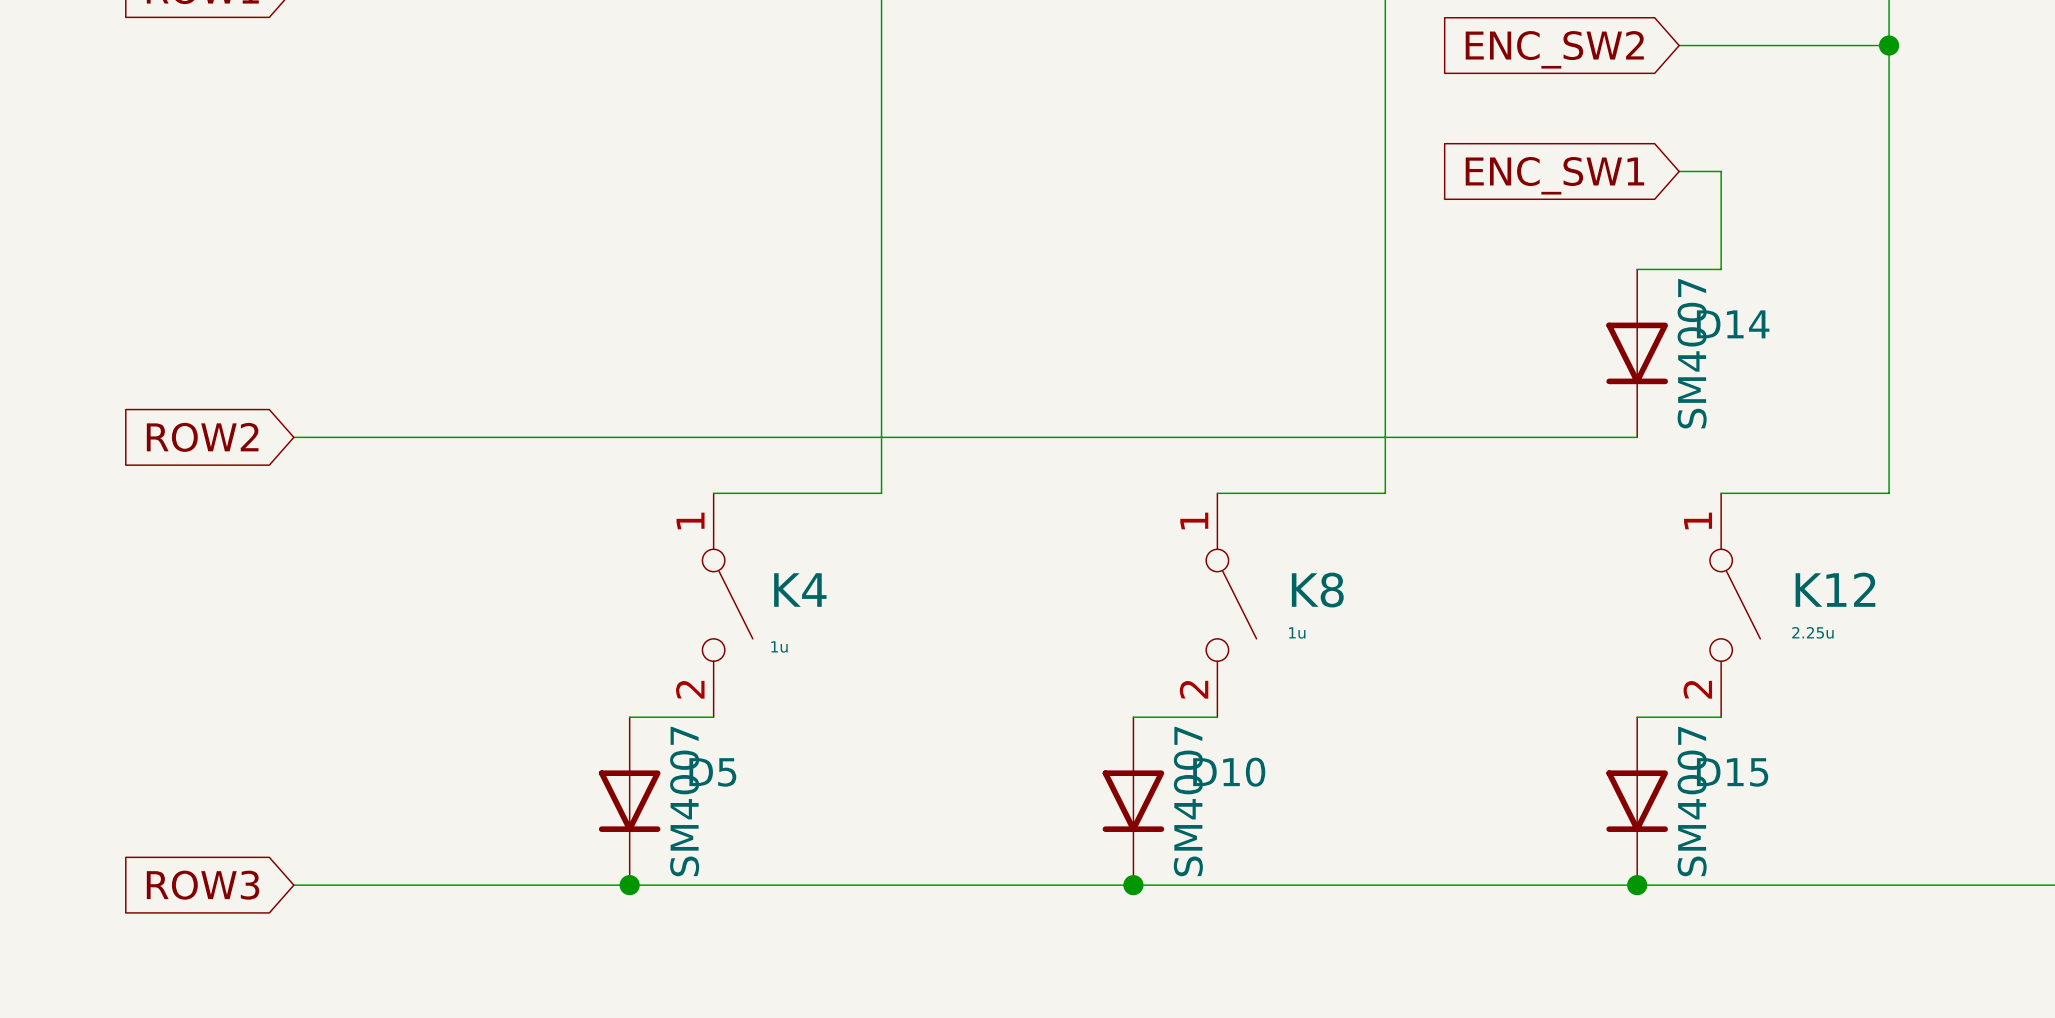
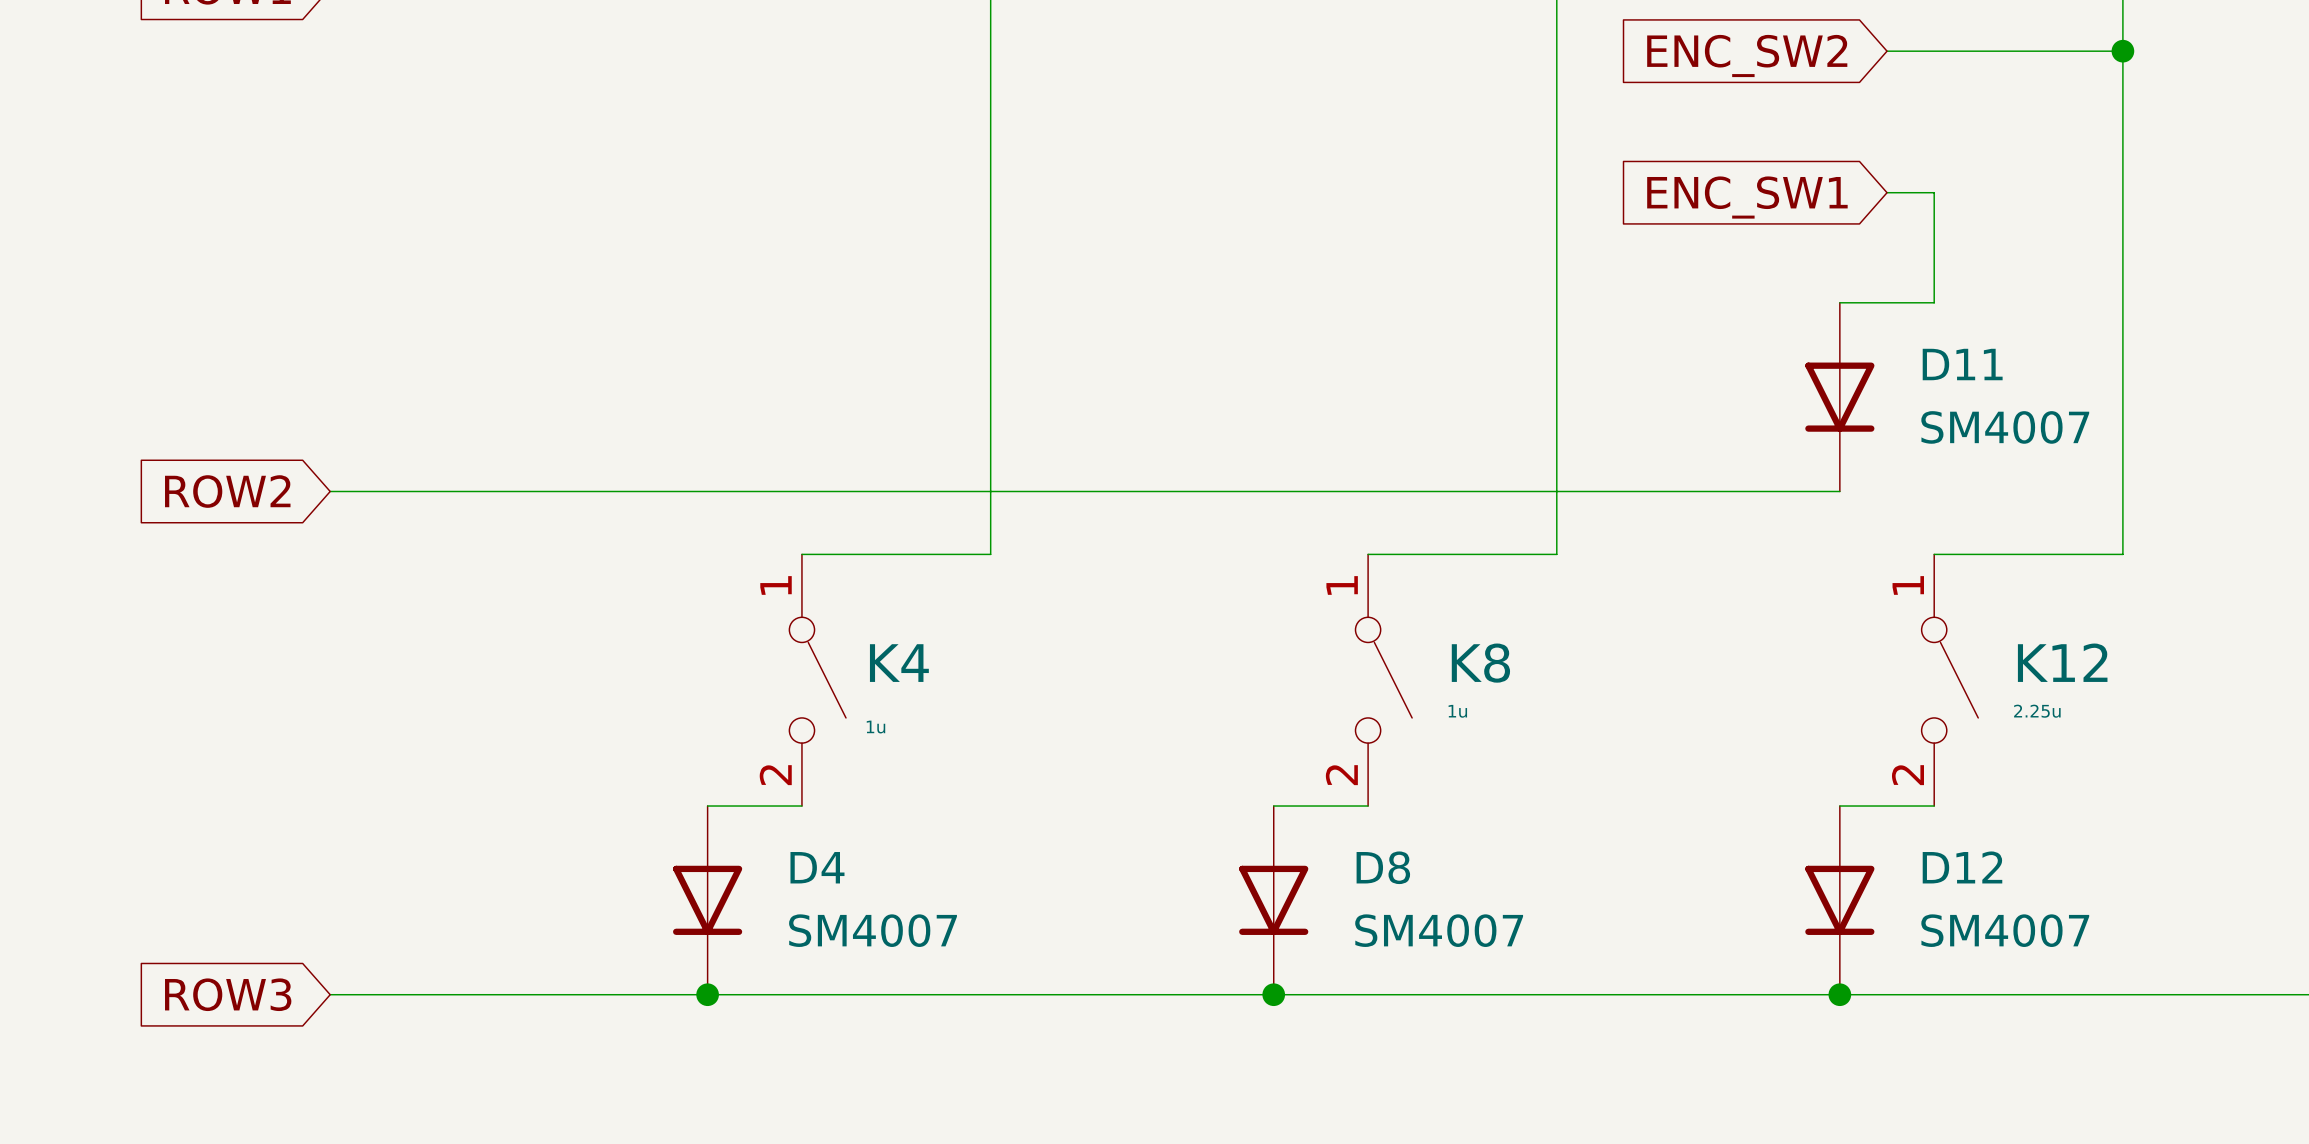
D14 name: D14 (1733, 324) -> D11 (1962, 364)
D14 value rotation: 0° (1692, 353) -> 90° clockwise (2005, 427)
D5 name: D5 (712, 772) -> D4 (817, 867)
D10 name: D10 (1229, 772) -> D8 (1383, 867)
D15 name: D15 (1732, 772) -> D12 (1962, 867)
D5 value rotation: 0° (684, 801) -> 90° clockwise (873, 930)
D10 value rotation: 0° (1188, 801) -> 90° clockwise (1439, 930)
D15 value rotation: 0° (1692, 801) -> 90° clockwise (2005, 930)

